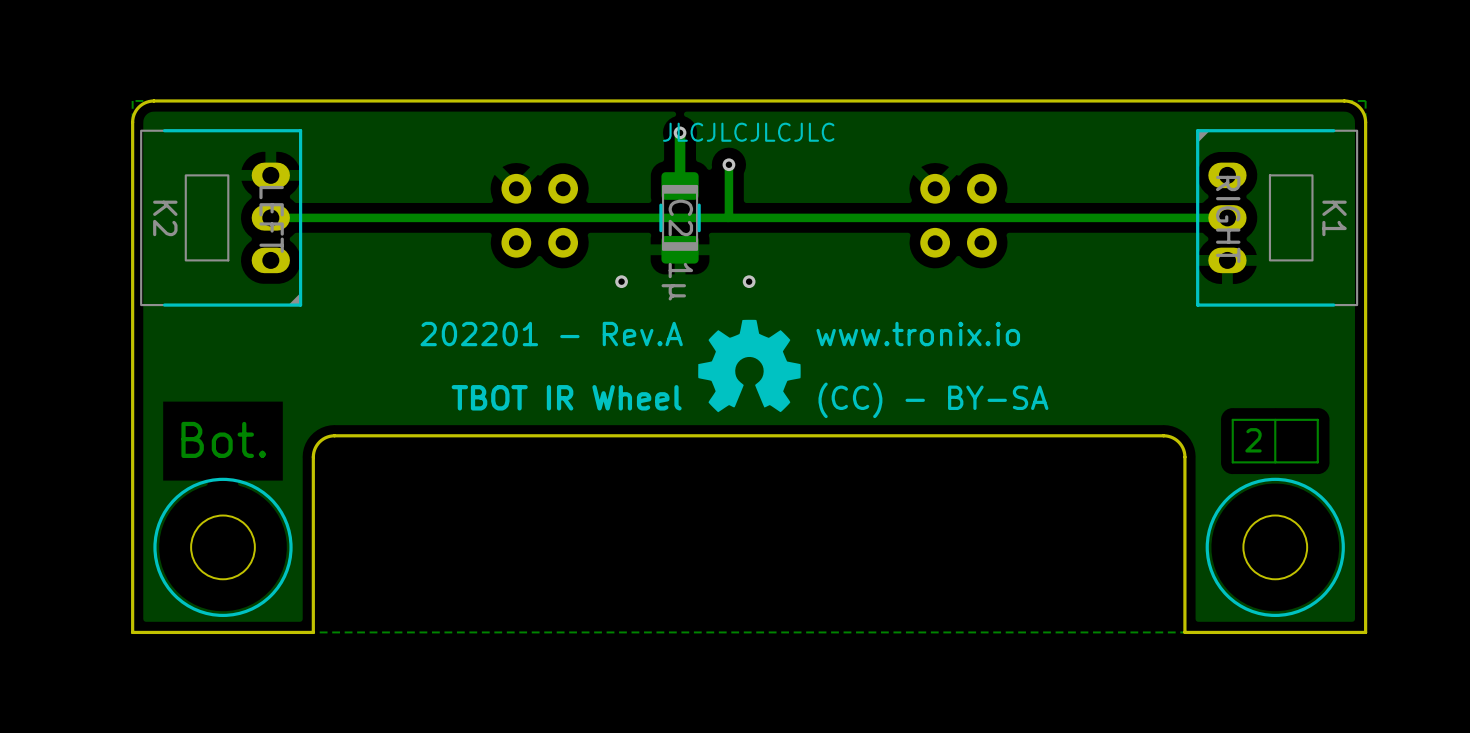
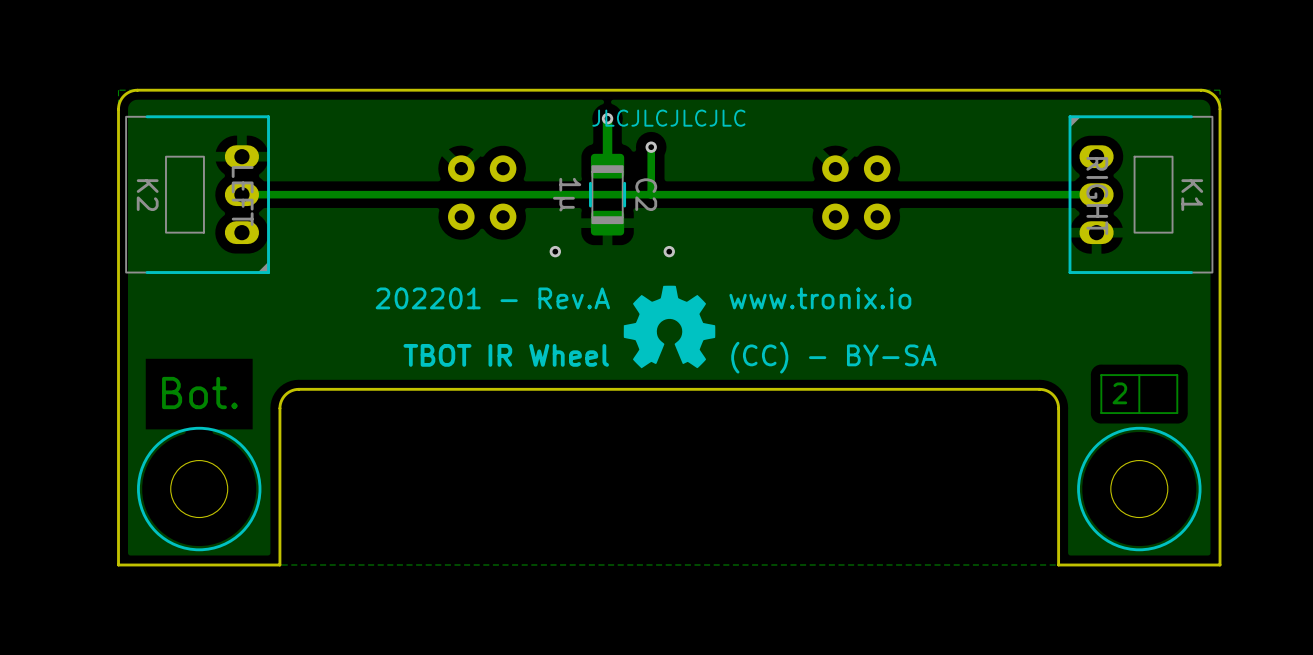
C2 name position: C2 (680, 217) -> C2 (646, 194)
C2 value position: 1µ (677, 281) -> 1µ (567, 194)

